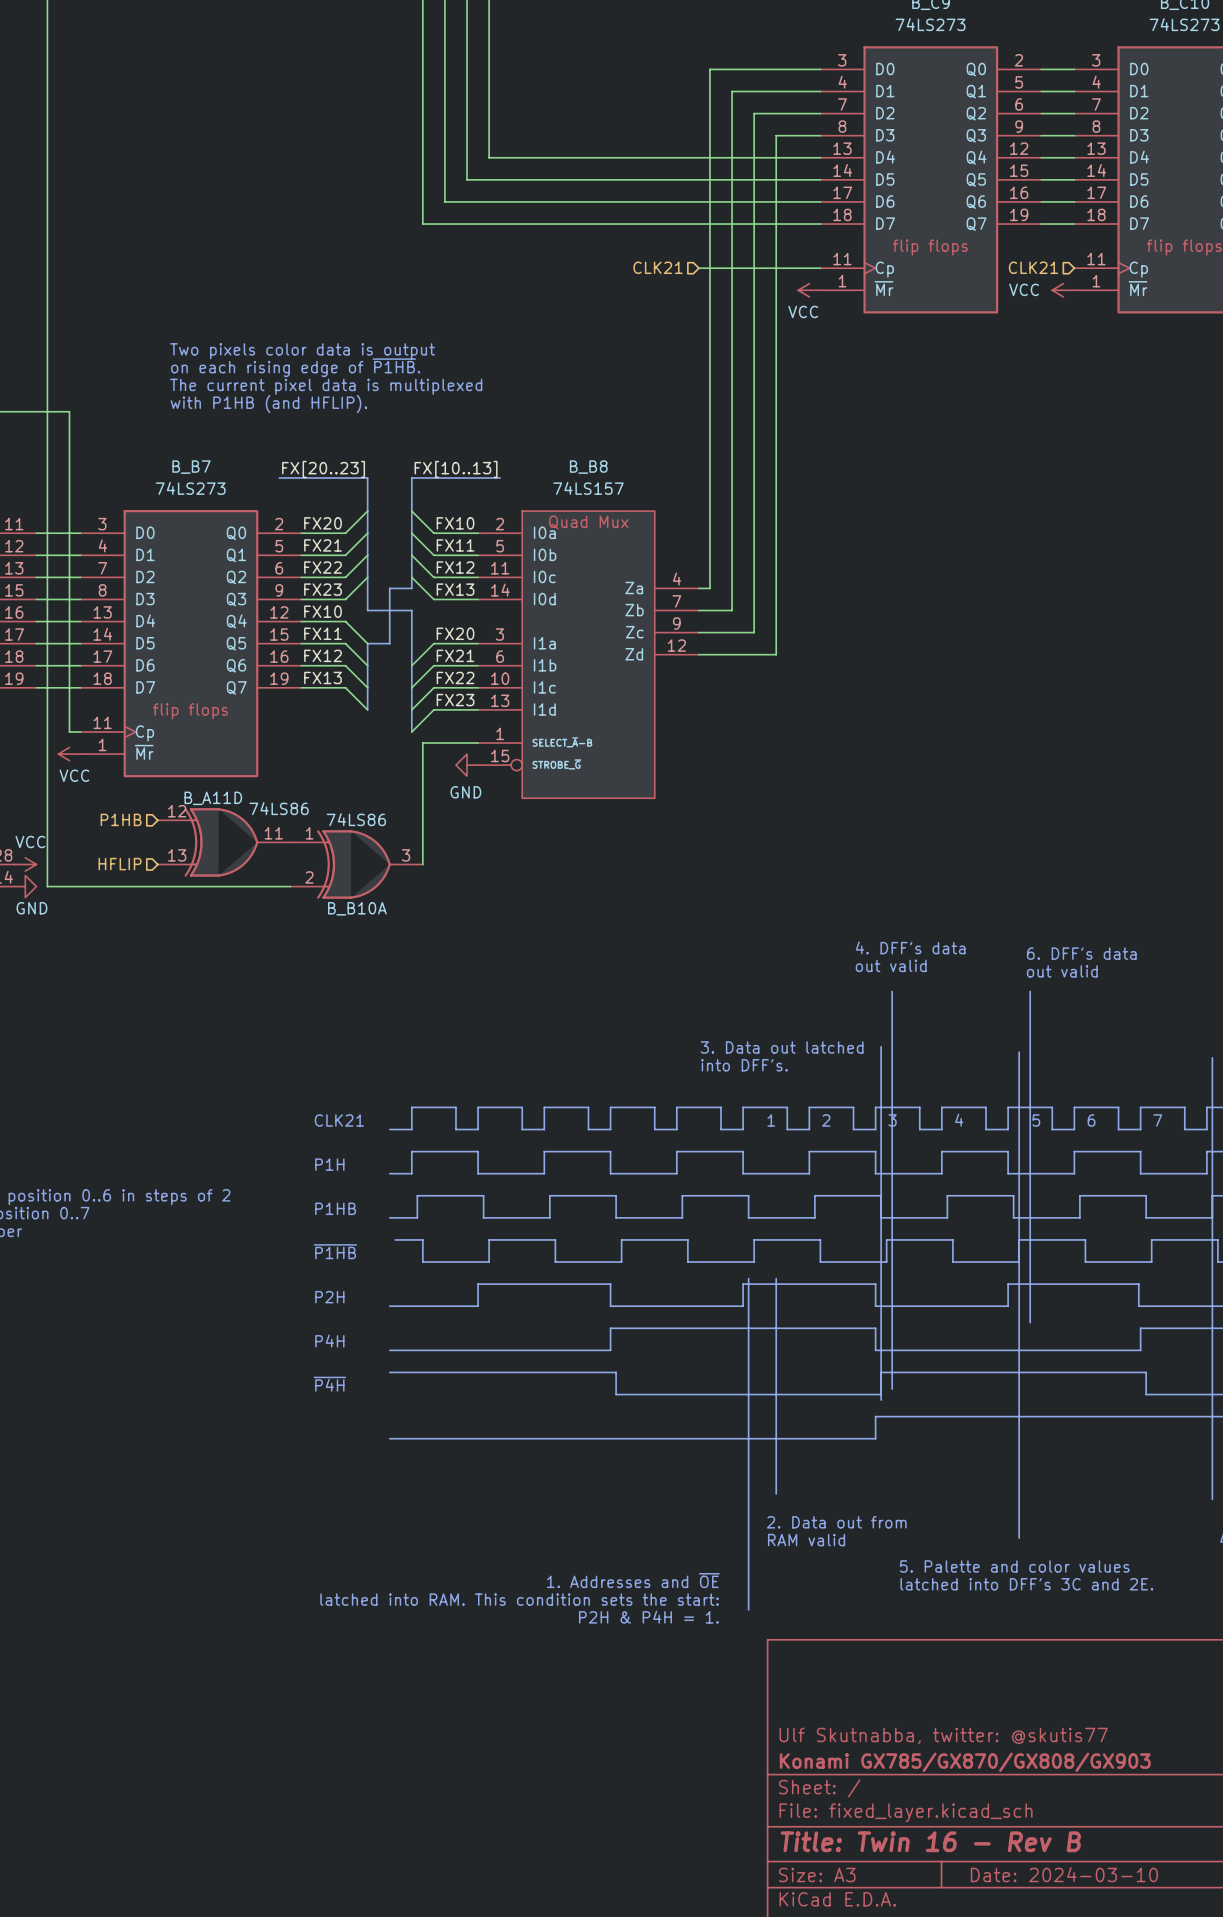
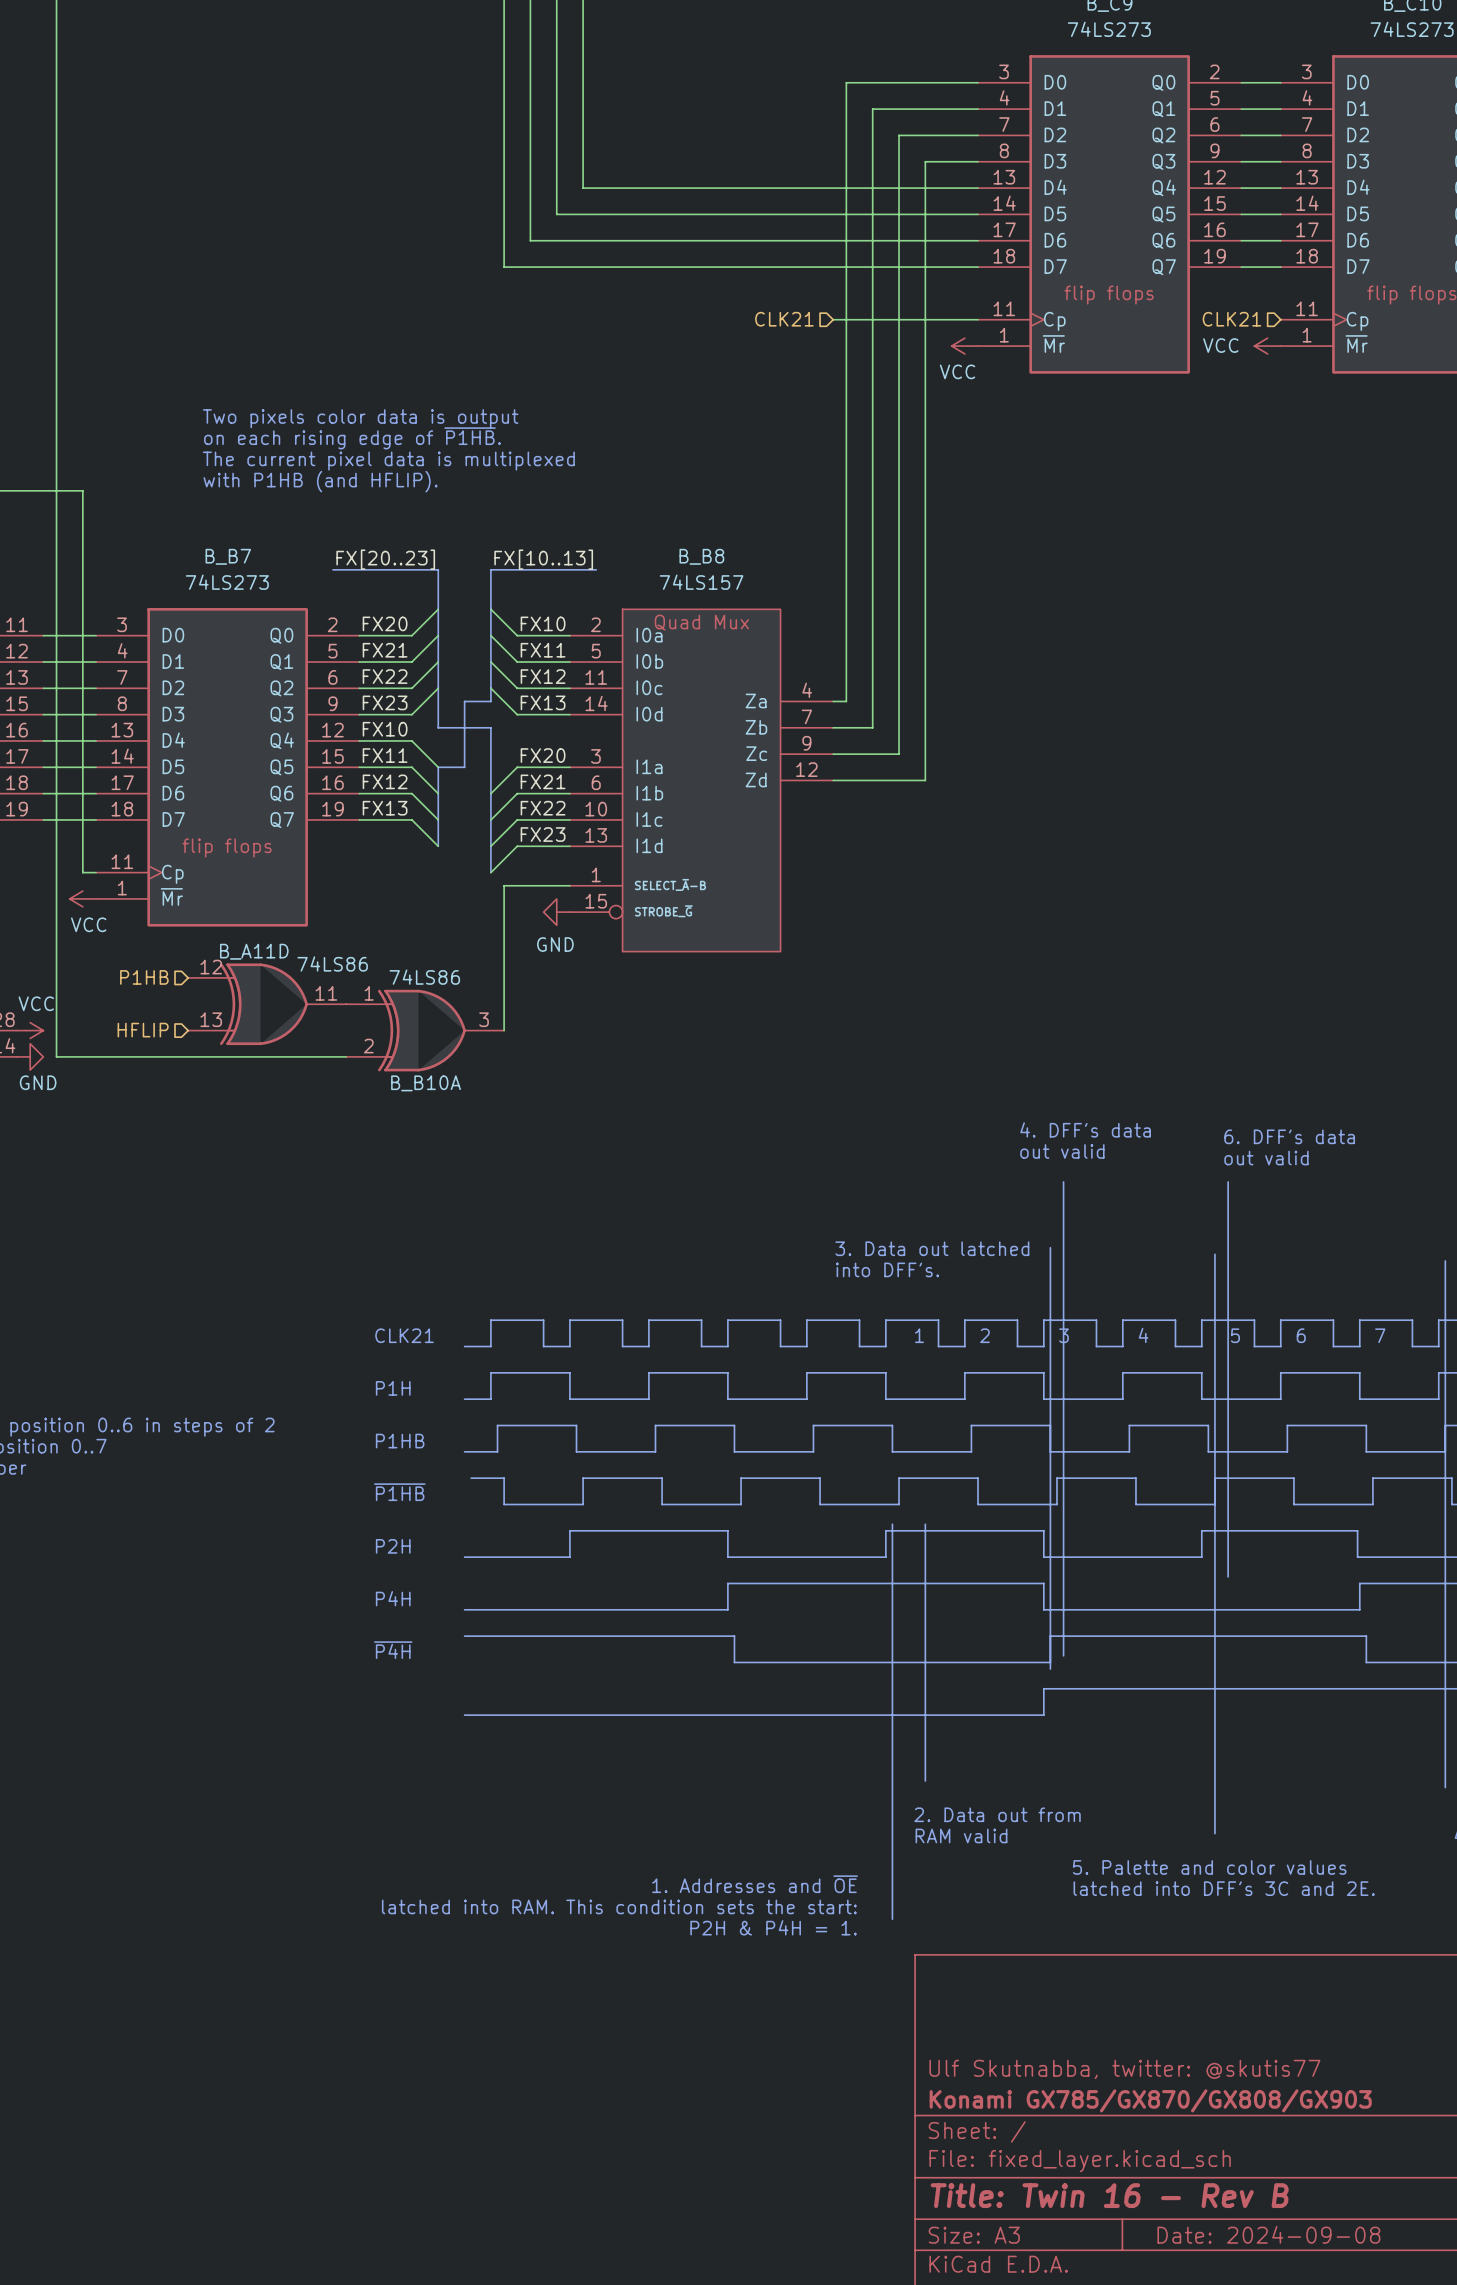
title block: Date: 2024-03-10 (1064, 1874) -> Date: 2024-09-08 (1268, 2234)

